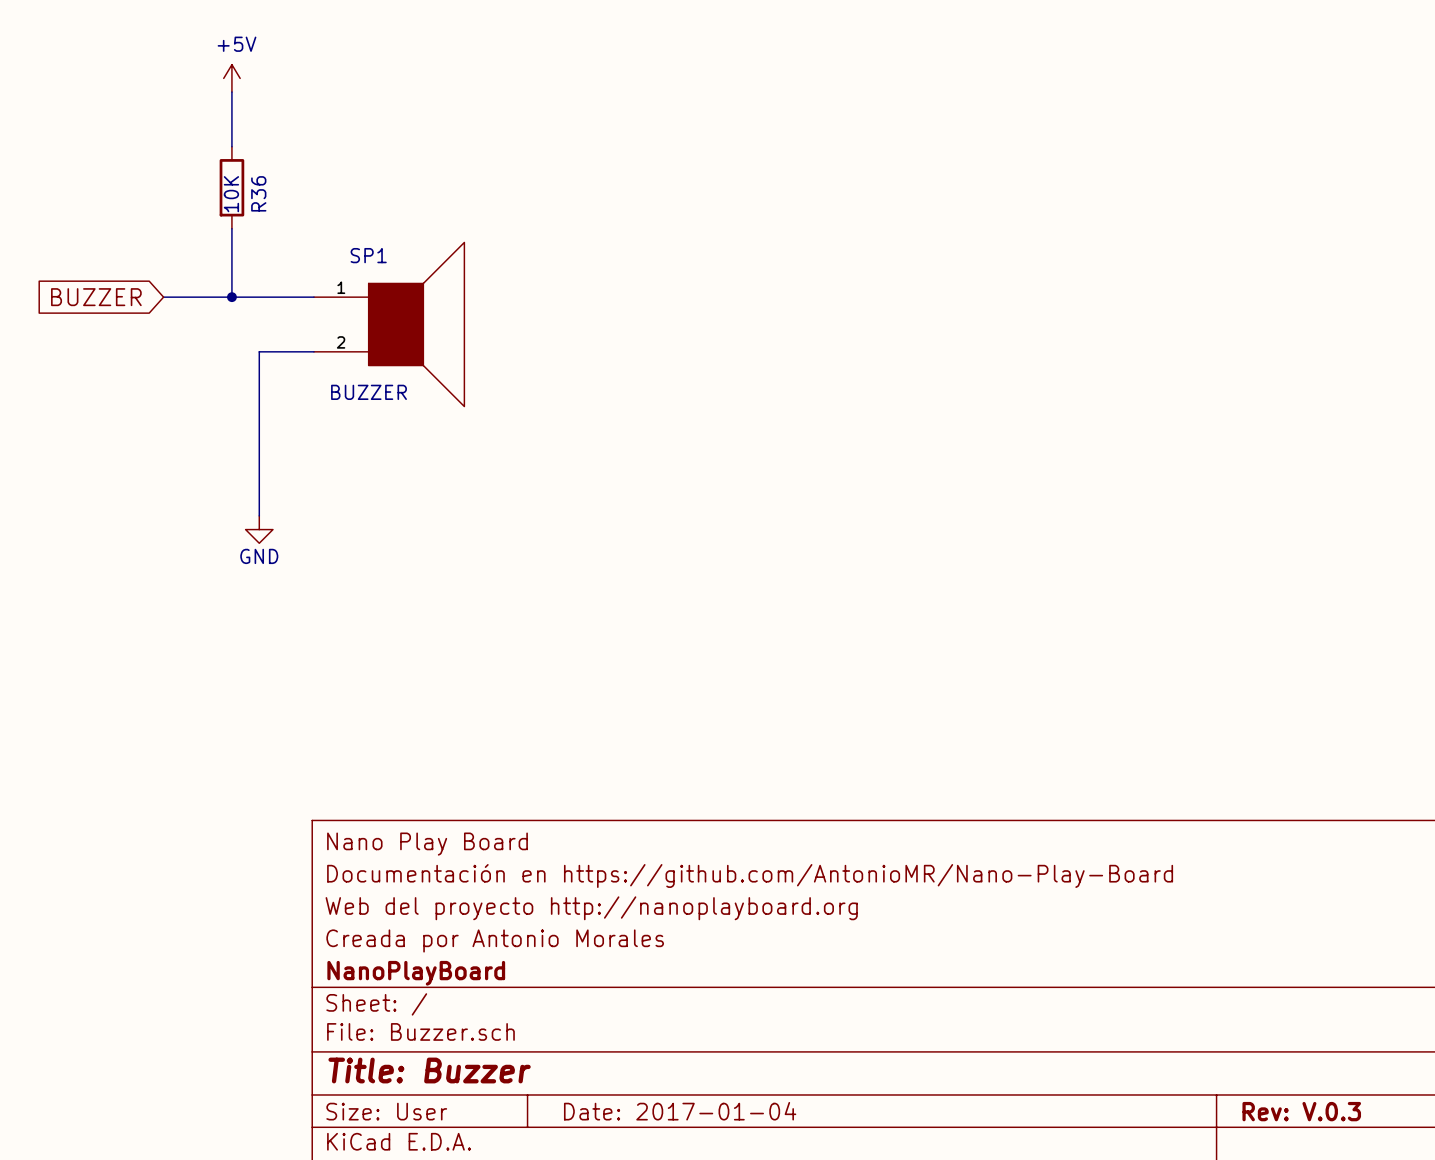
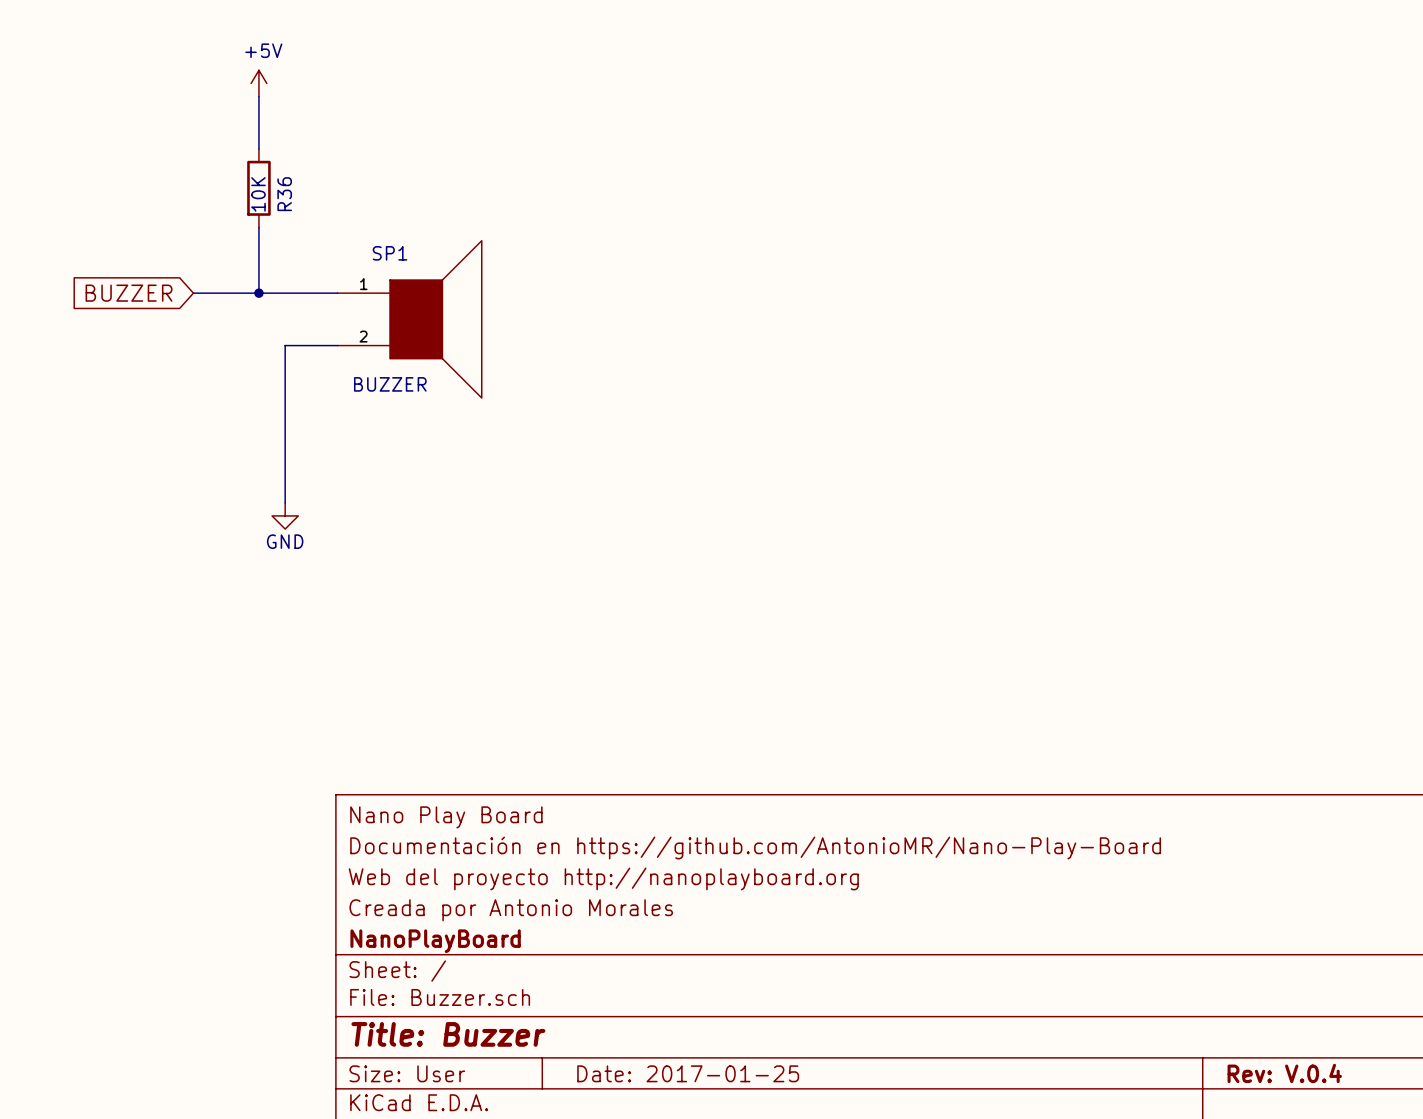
title block: Date: 2017-01-04 (680, 1111) -> Date: 2017-01-25 (688, 1073)
title block: Rev: V.0.3 (1301, 1111) -> Rev: V.0.4 (1284, 1073)

